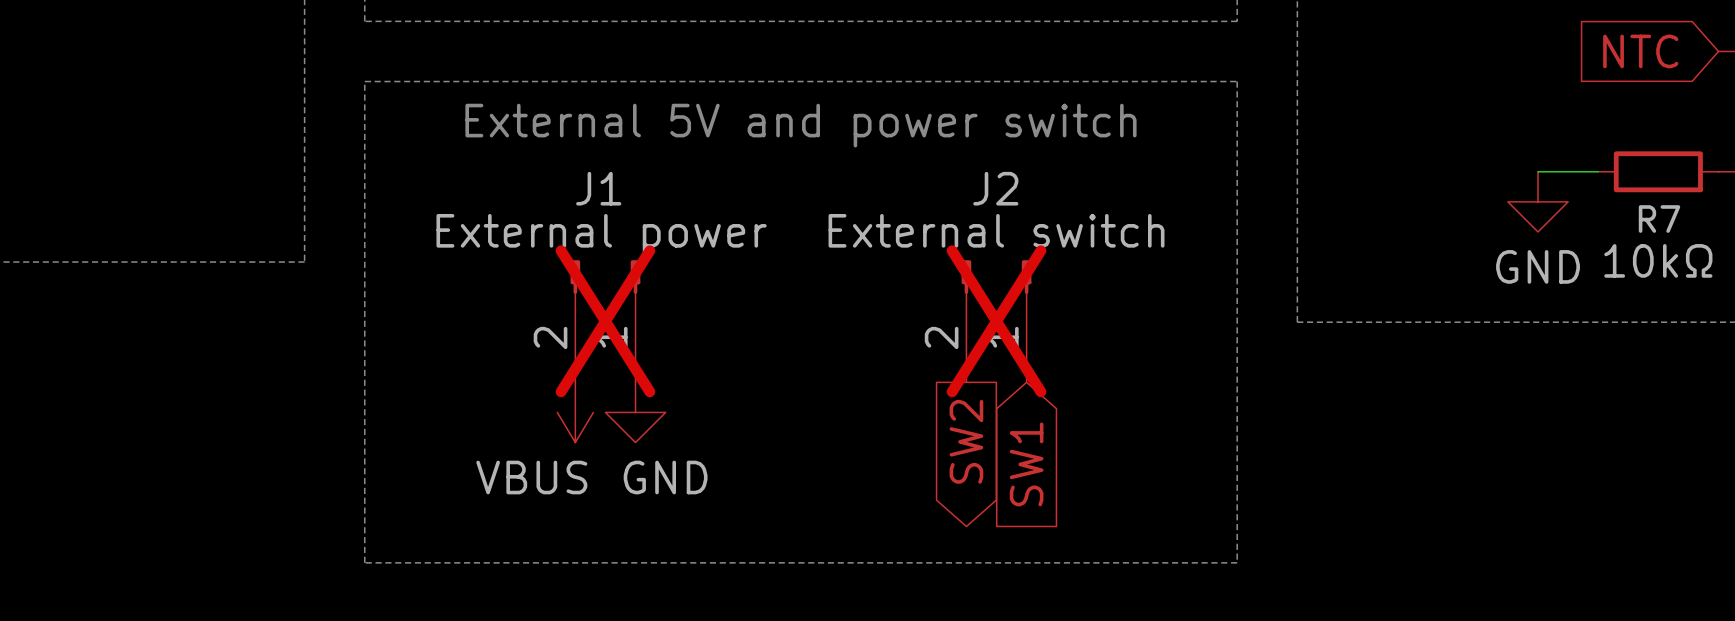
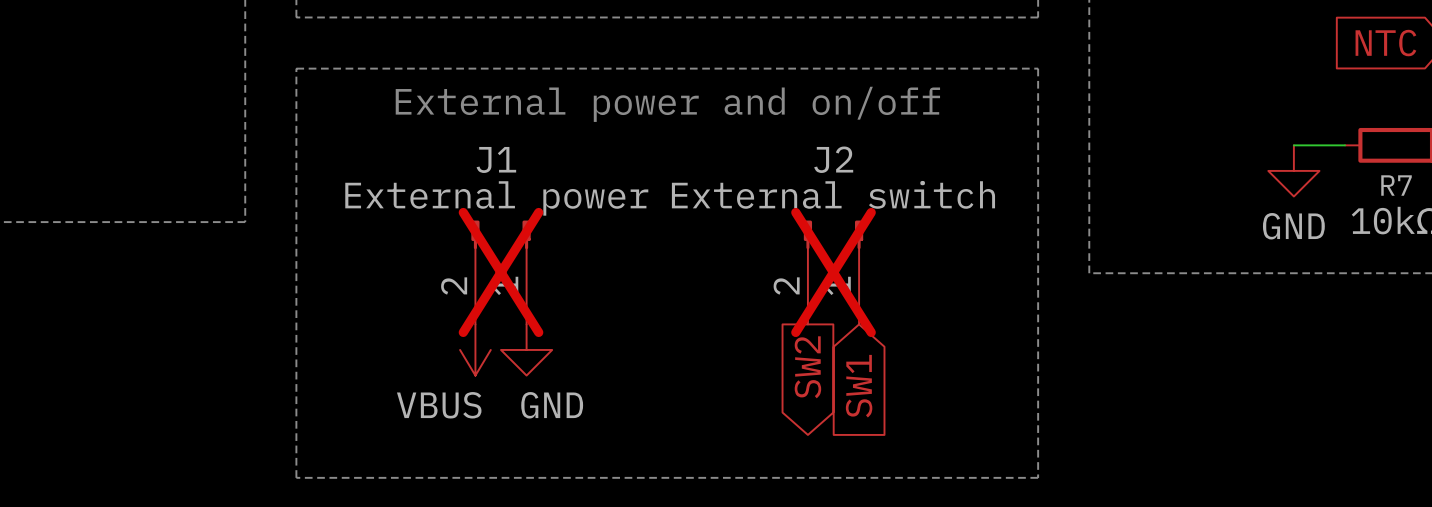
text: External 5V and power switch (800, 125) -> External power and on/off (667, 104)

